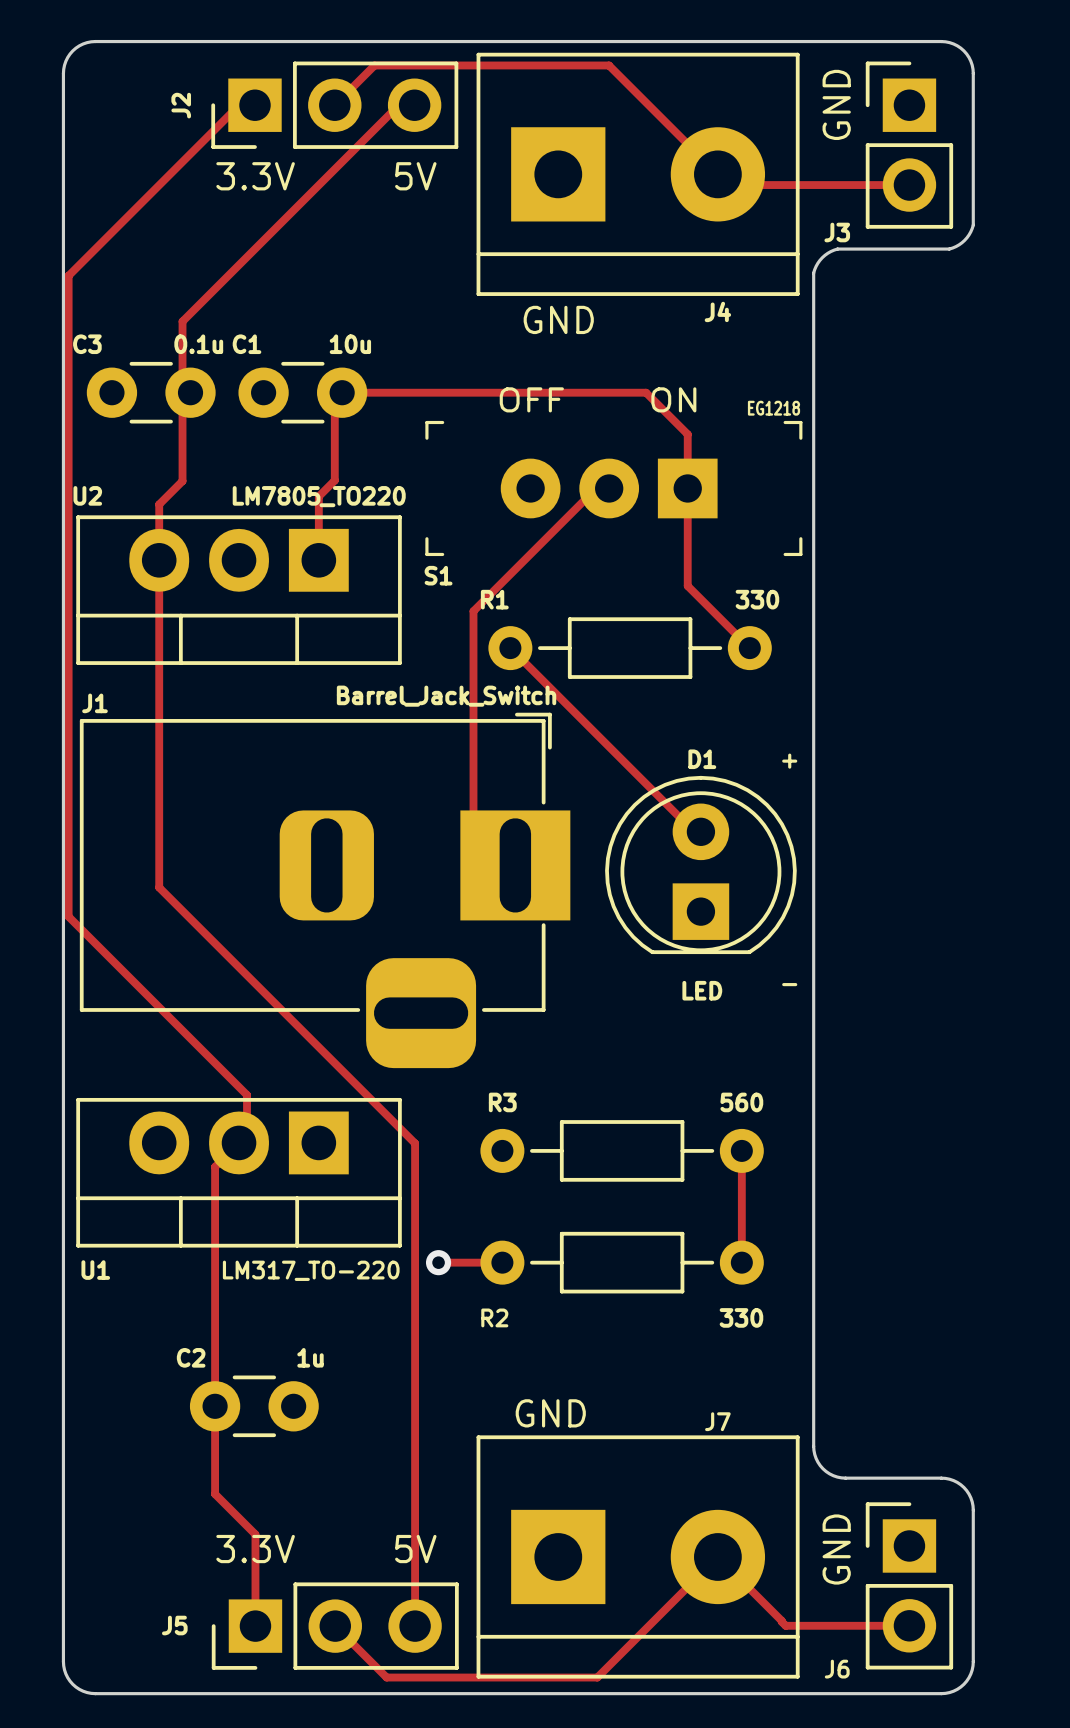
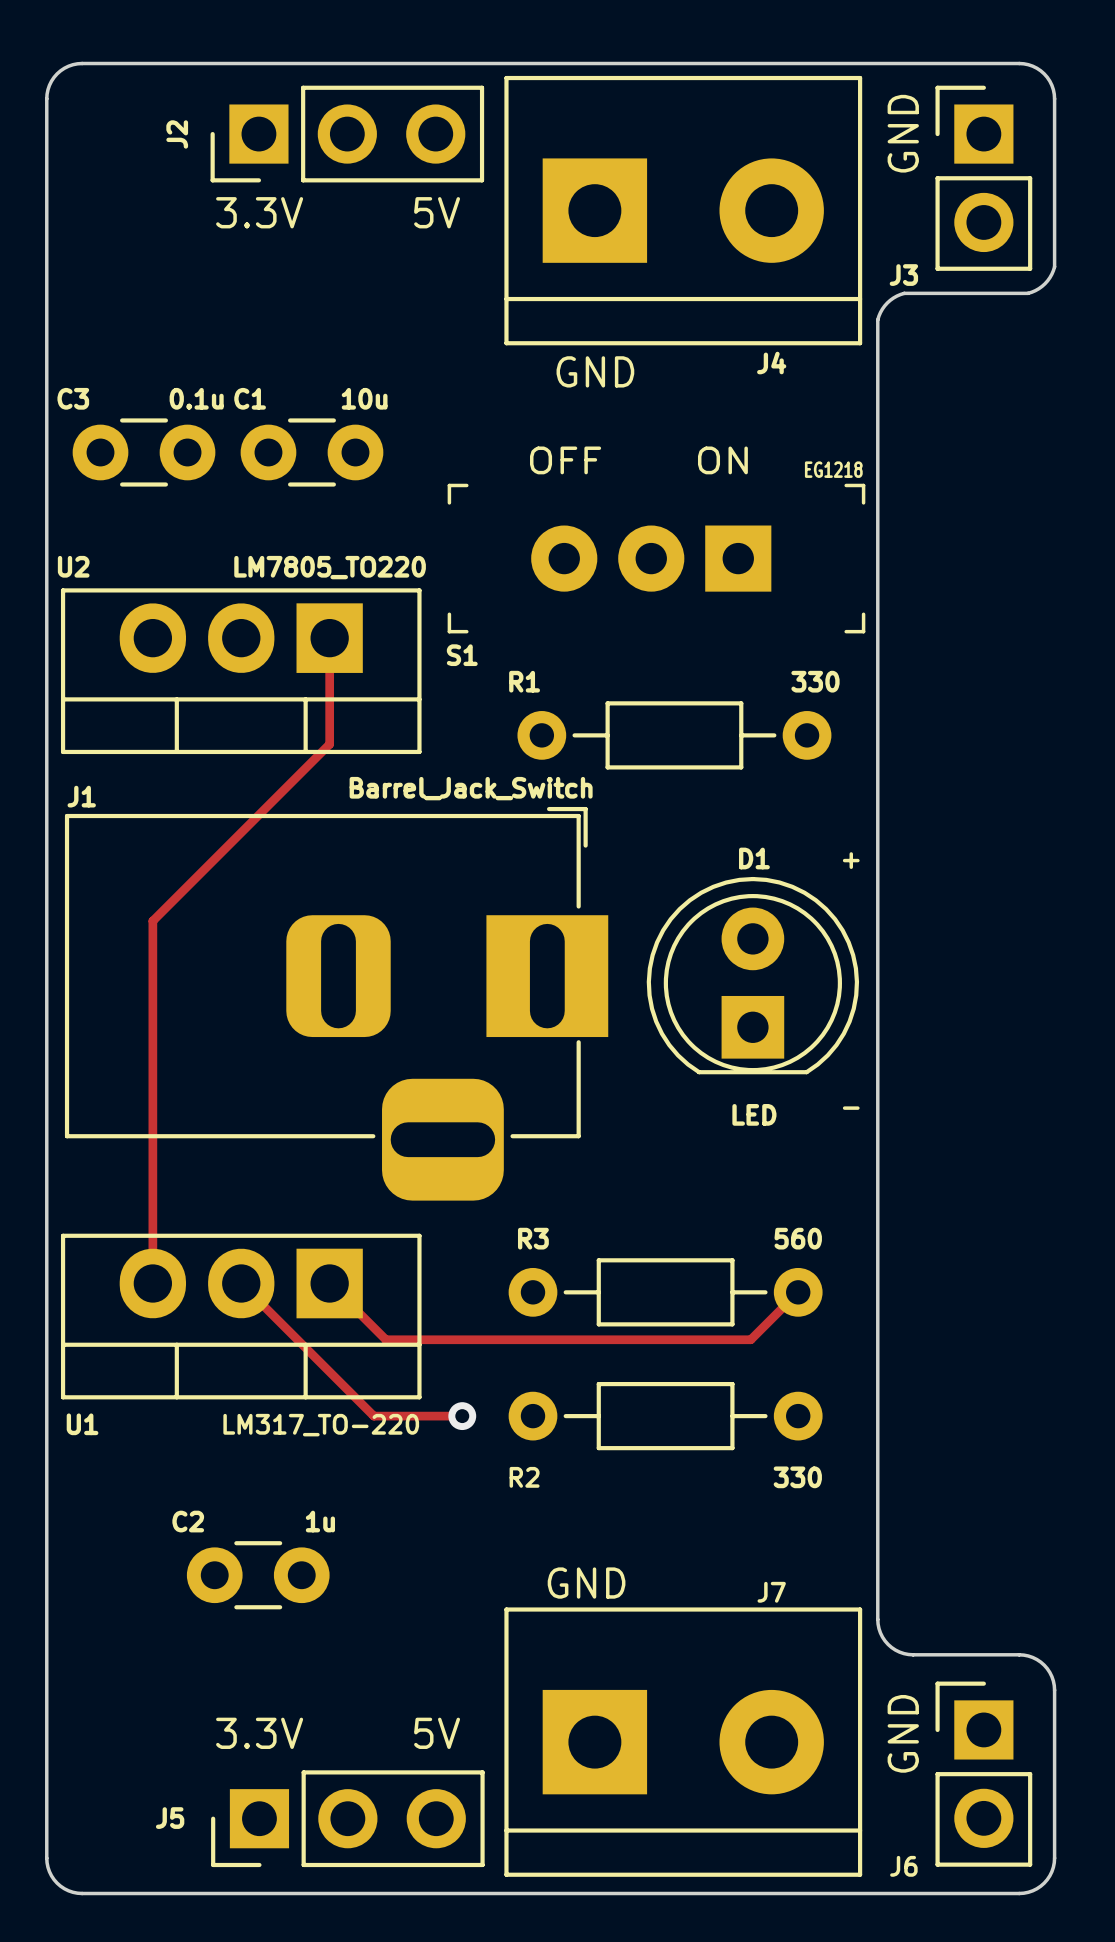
track: (334, 105) (374, 65) (609, 65) (707, 164) -> none
track: (231, 113) (68, 275) (68, 916) (247, 1095) (247, 1145) -> none
track: (390, 113) (182, 321) (182, 481) (159, 504) (159, 815) -> (329, 638) (329, 744) (152, 921)
track: (727, 164) (748, 185) (909, 185) -> none
track: (609, 488) (596, 488) (473, 611) (473, 823) -> none
track: (318, 560) (318, 496) (334, 480) (334, 392) (646, 392) (687, 434) (687, 586) (749, 648) -> none
track: (510, 648) (694, 831) (700, 831) -> none
track: (159, 887) (415, 1143) (415, 1626) -> (152, 1000) (152, 1283)
track: (239, 1142) (215, 1166) (215, 1494) (255, 1534) (255, 1626) -> none
track: (741, 1150) (741, 1262) -> (798, 1292) (750, 1339) (385, 1339) (329, 1283)
track: (438, 1262) (502, 1262) -> (462, 1416) (373, 1416) (241, 1283)
track: (909, 1625) (785, 1625) (717, 1556) (597, 1677) (386, 1677) (335, 1626) -> none

